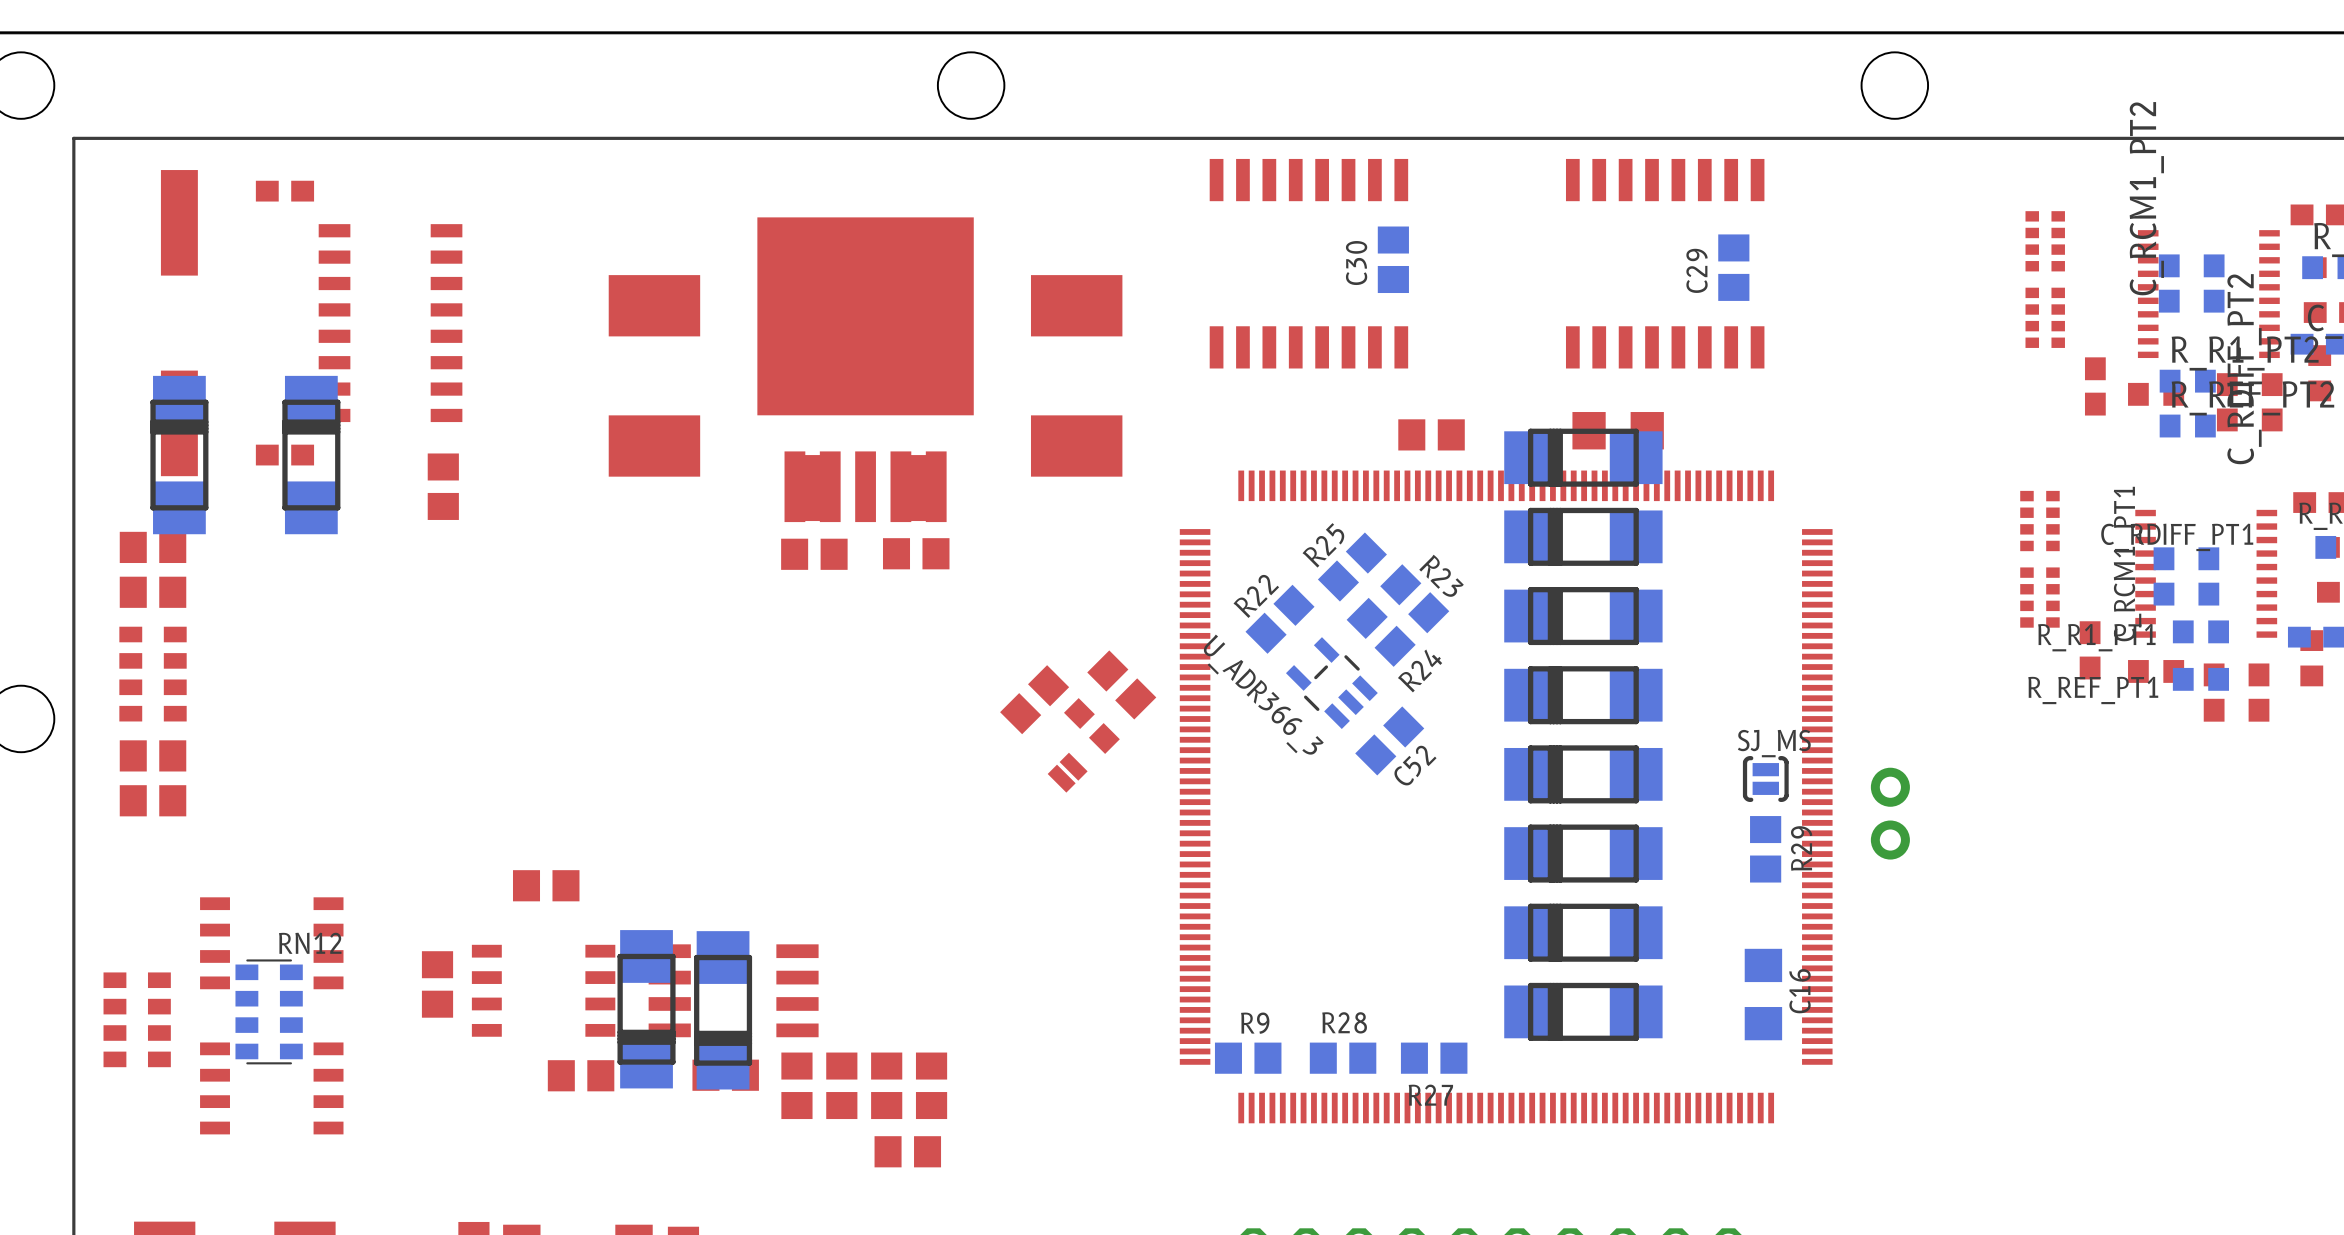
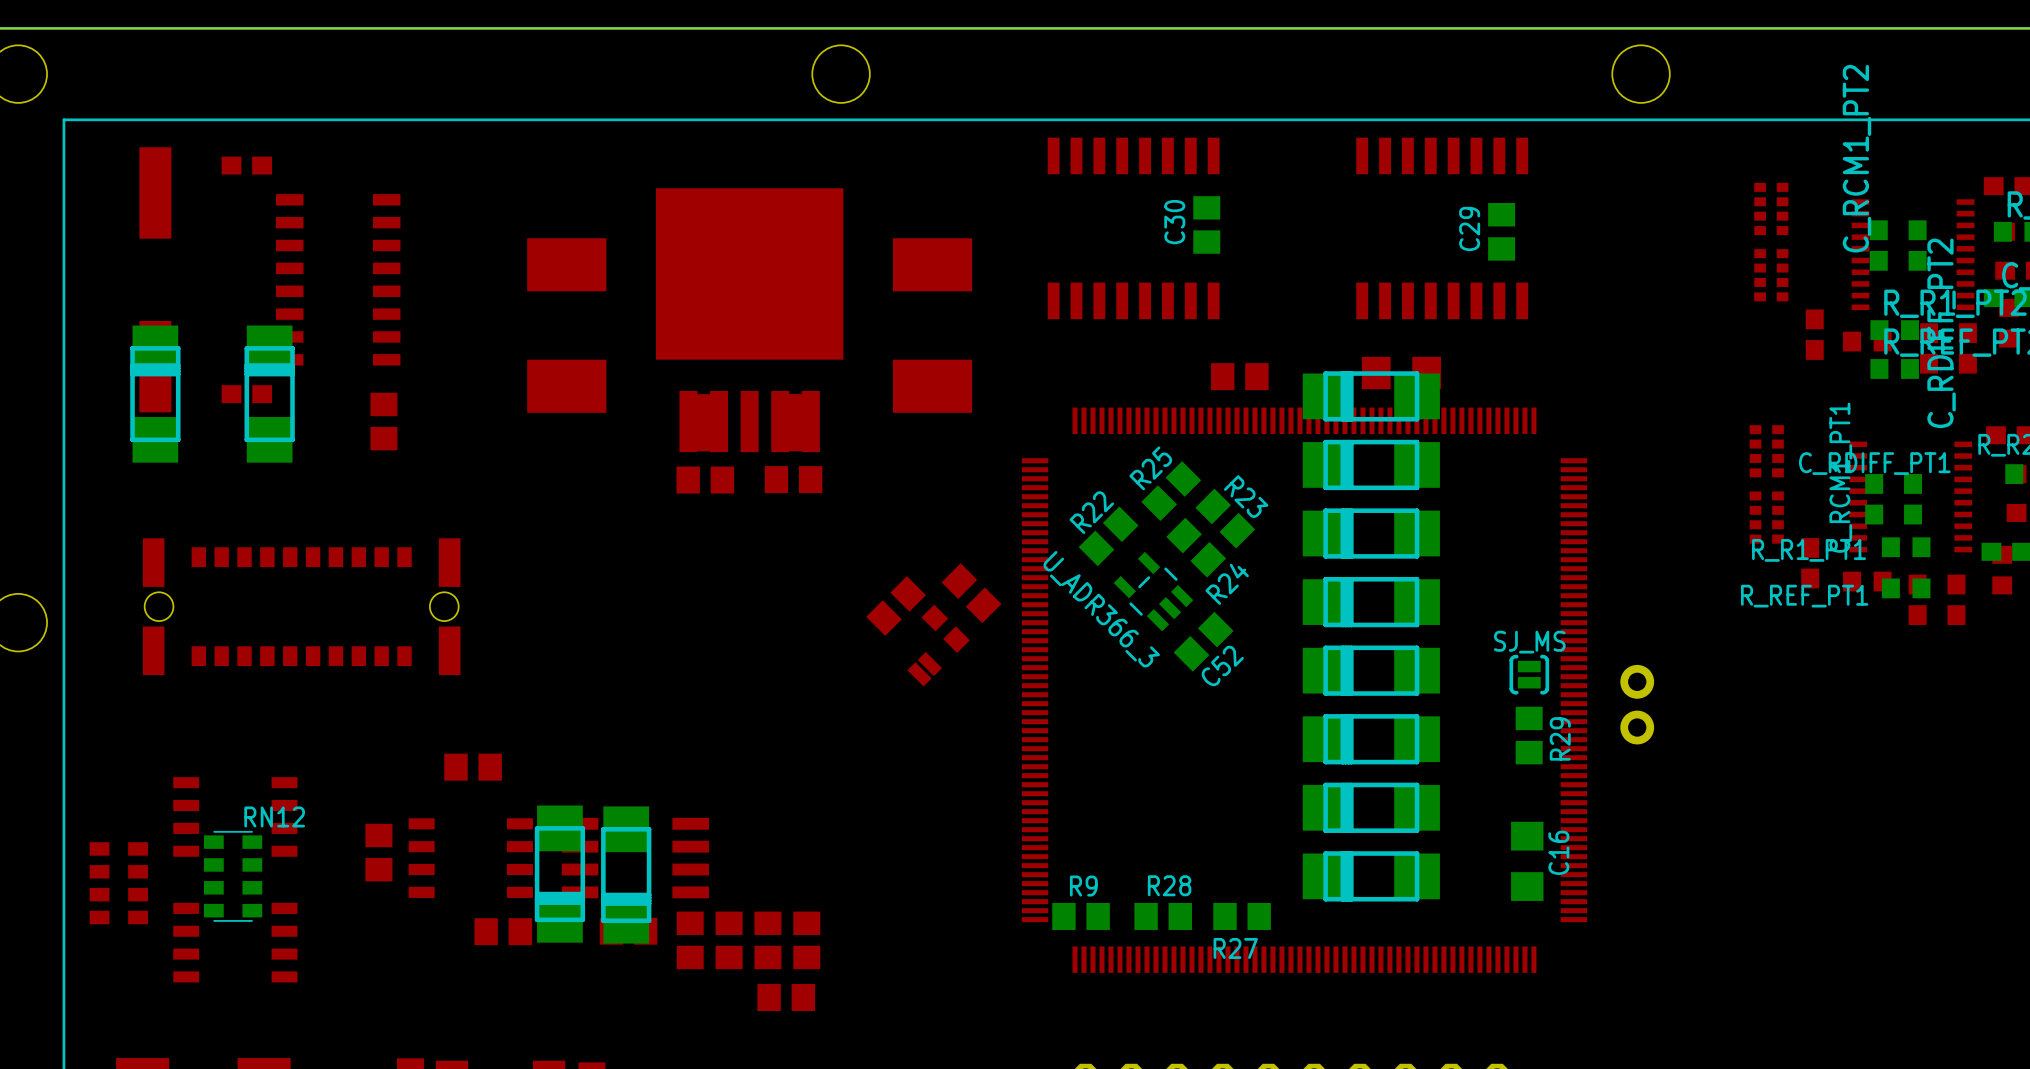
part: (153, 547) -> none
part: (153, 592) -> none
part: (153, 674) -> none
part: none -> (301, 606)
part: (153, 755) -> none
part: (153, 800) -> none

